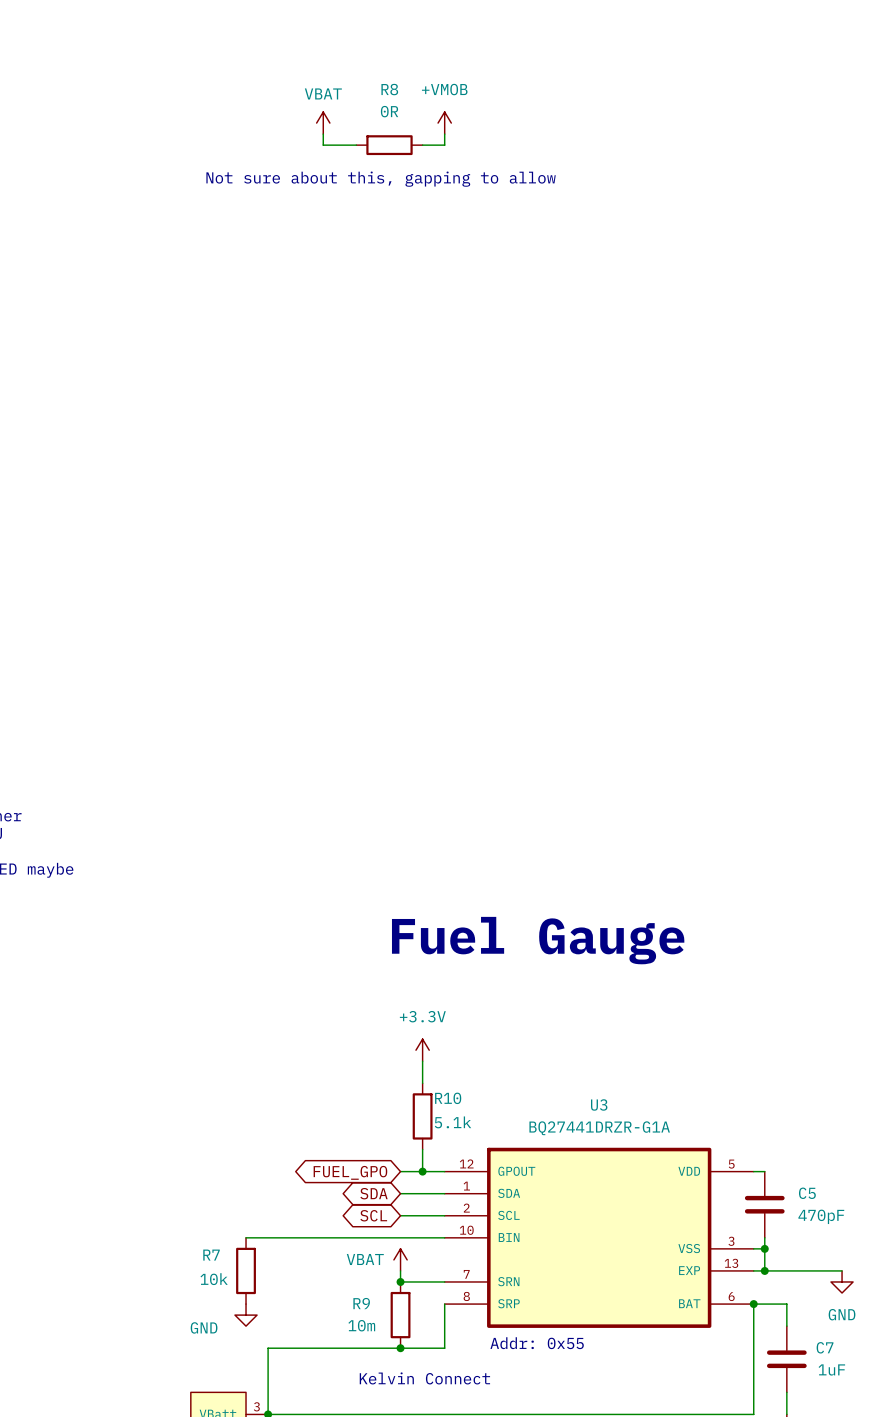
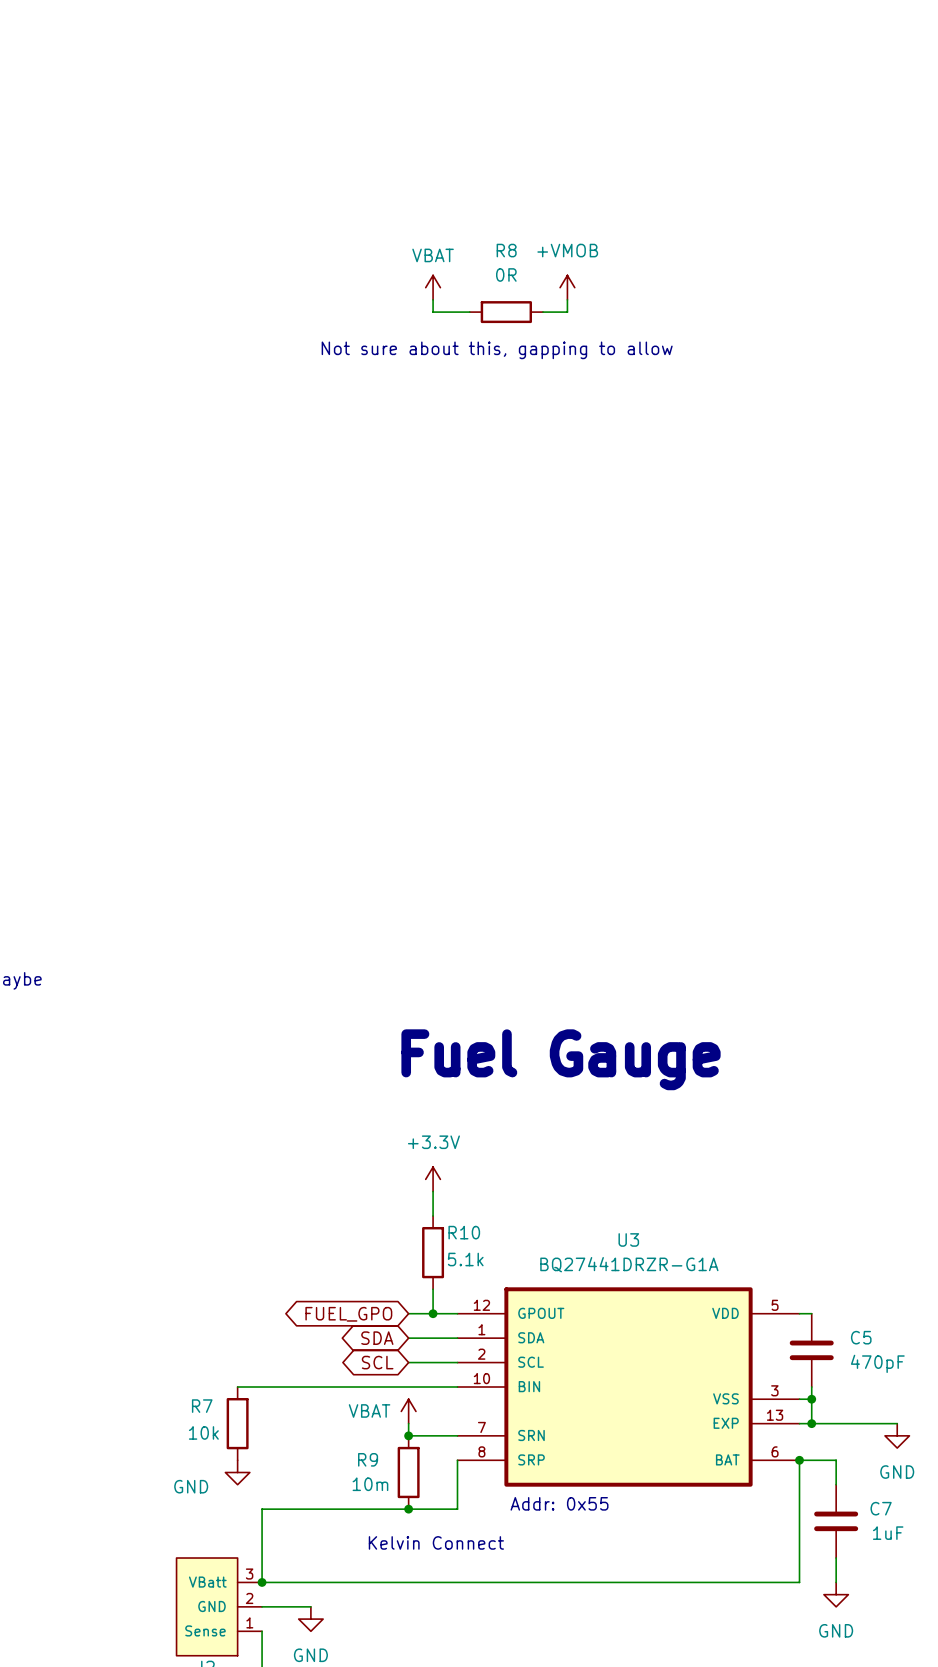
power symbol position: VBAT (323, 123) -> VBAT (433, 287)
power symbol position: +VMOB (444, 123) -> +VMOB (567, 287)
wire: (323, 134) (323, 145) (356, 145) -> (433, 299) (433, 312) (469, 312)
wire: (444, 134) (444, 145) (422, 145) -> (567, 299) (567, 312) (542, 312)
R8 position: (389, 145) -> (506, 312)
text position: Not sure about this, gapping to allow (381, 179) -> Not sure about this, gapping to allow (497, 350)

